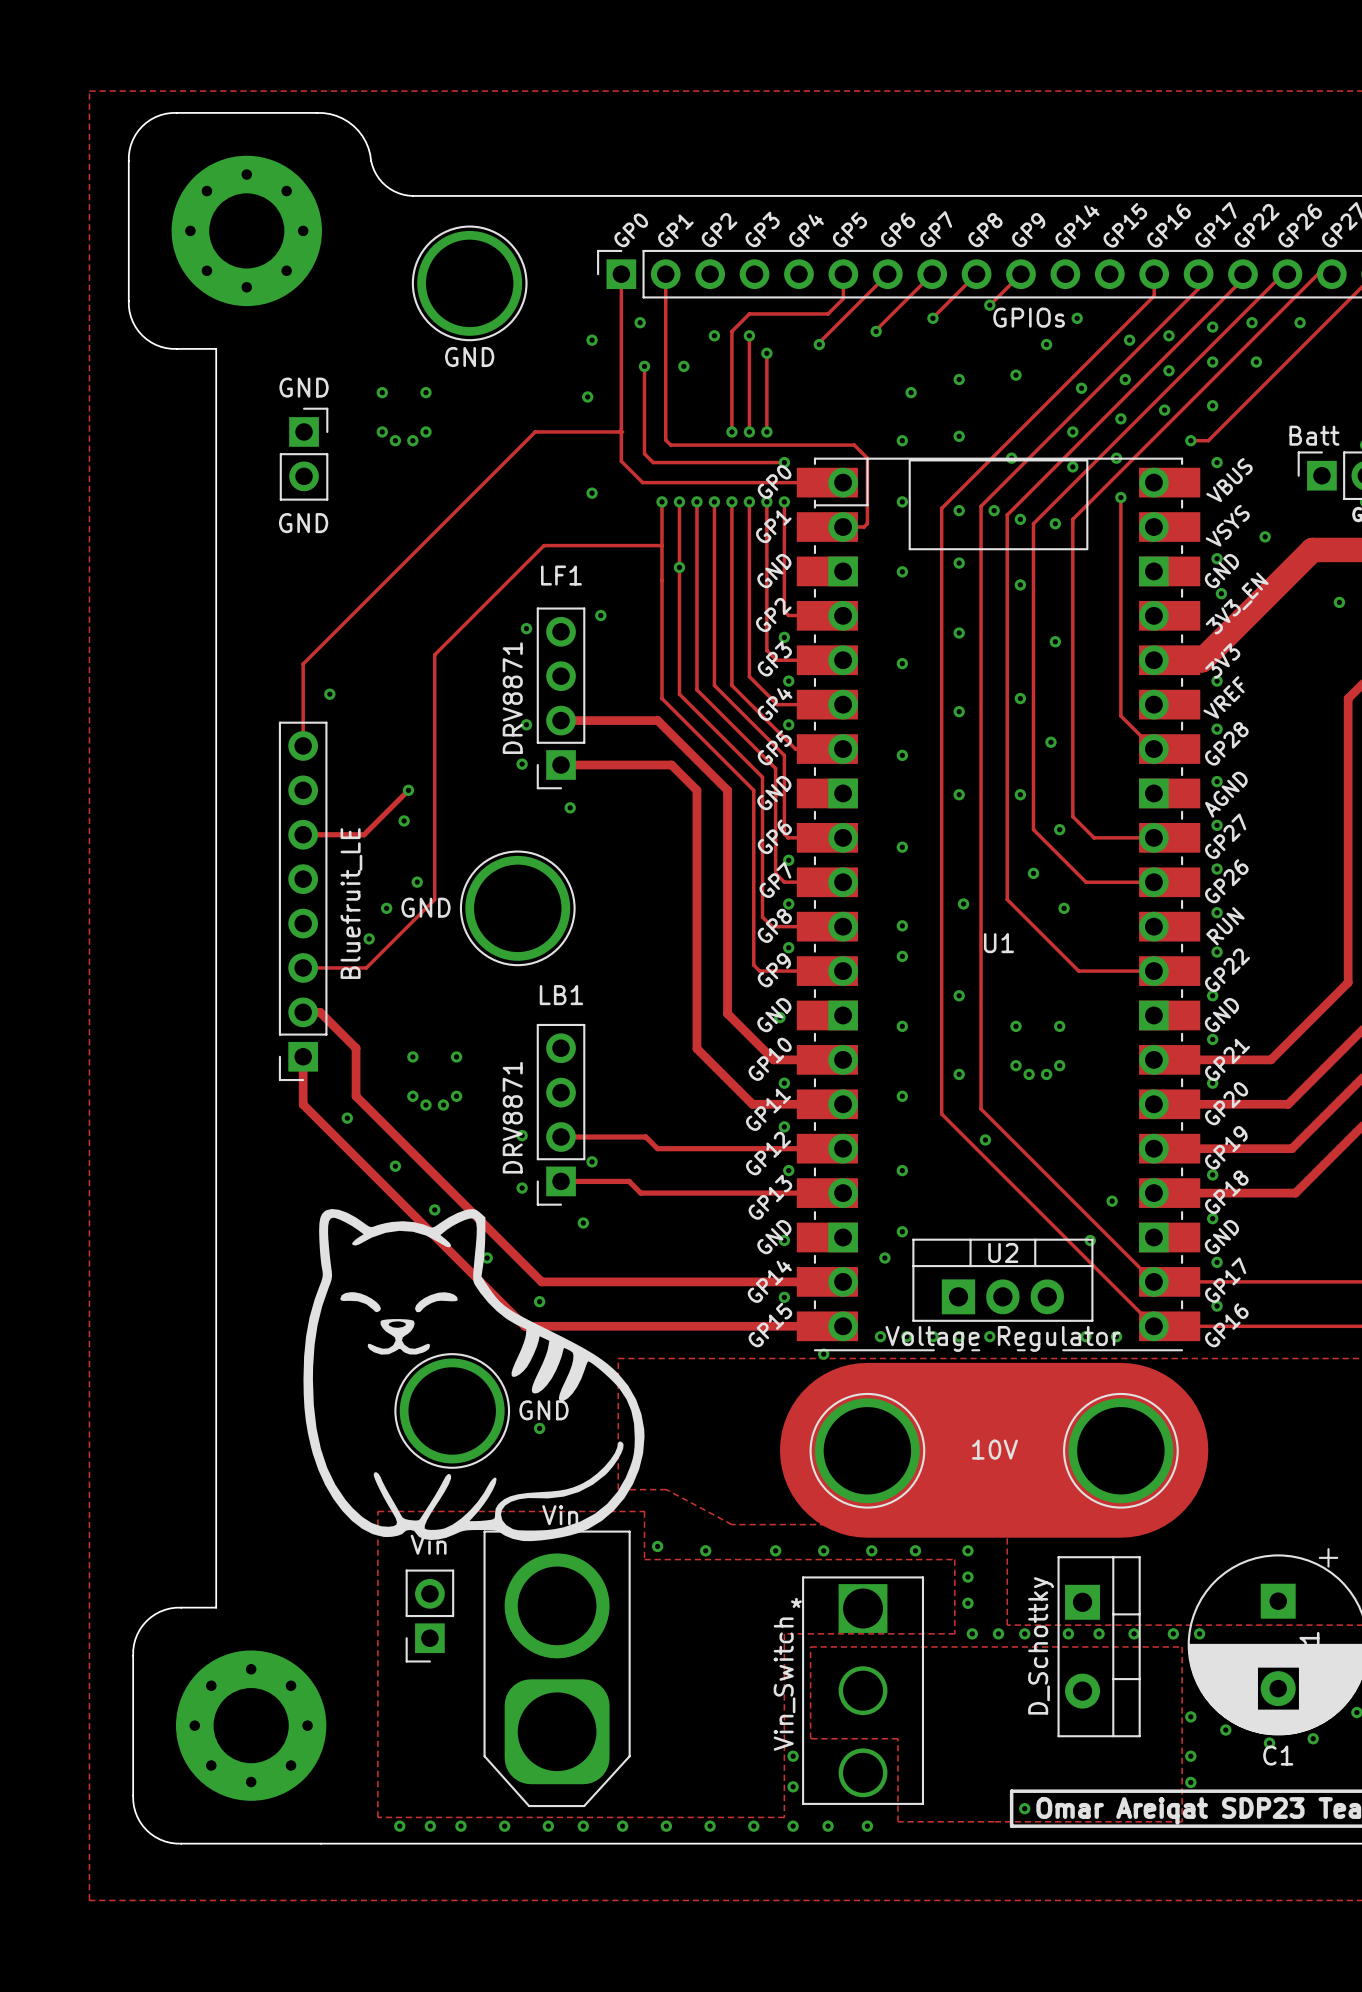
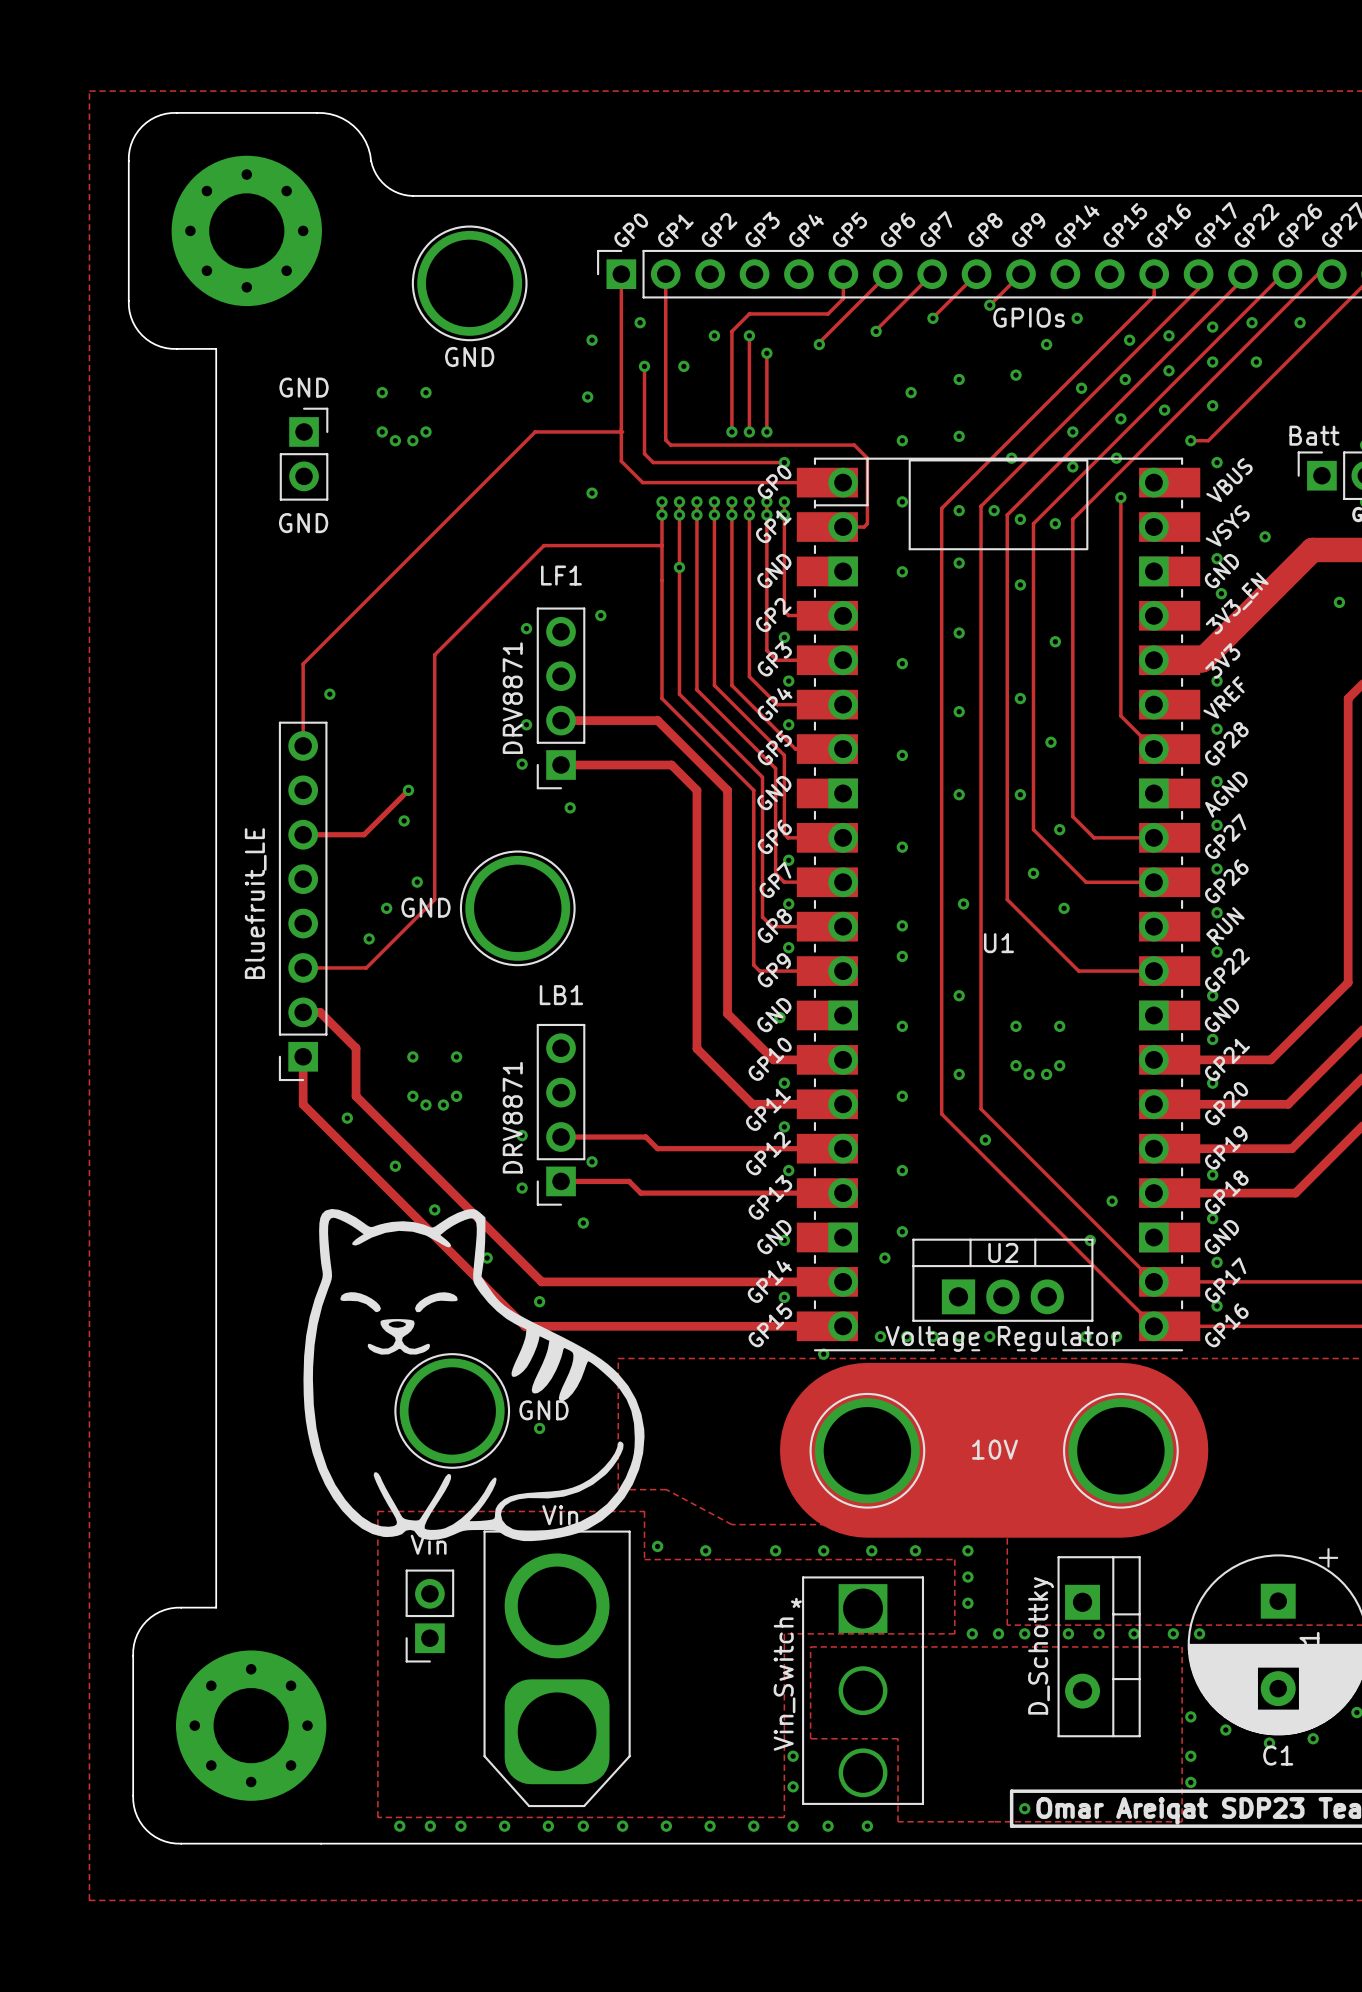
via: none -> (661, 515)
via: none -> (679, 515)
via: none -> (696, 515)
via: none -> (714, 515)
via: none -> (731, 515)
via: none -> (749, 515)
via: none -> (766, 515)
via: none -> (784, 515)
part value position: Bluefruit_LE (351, 903) -> Bluefruit_LE (255, 903)

